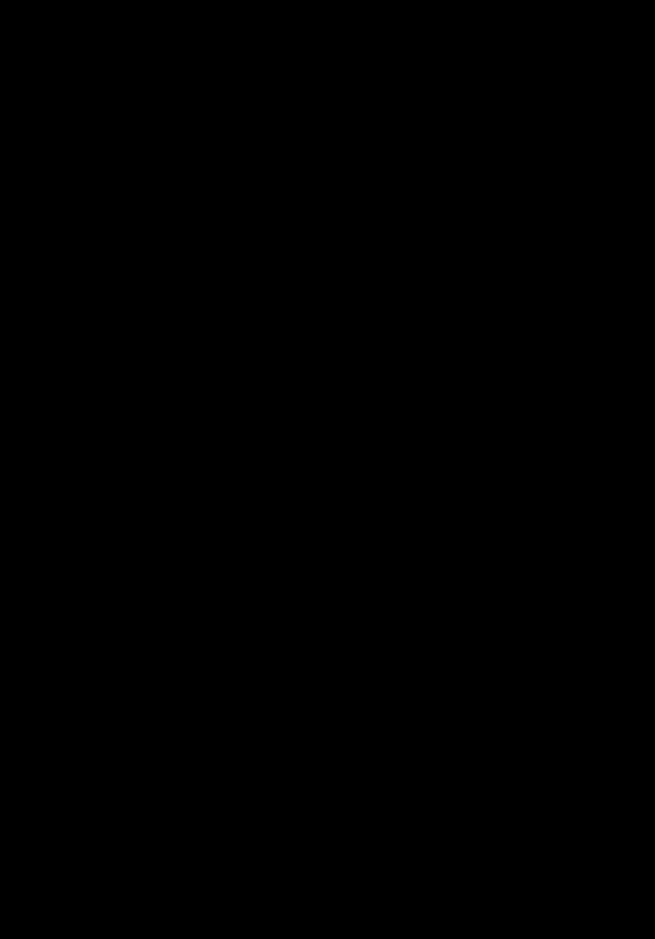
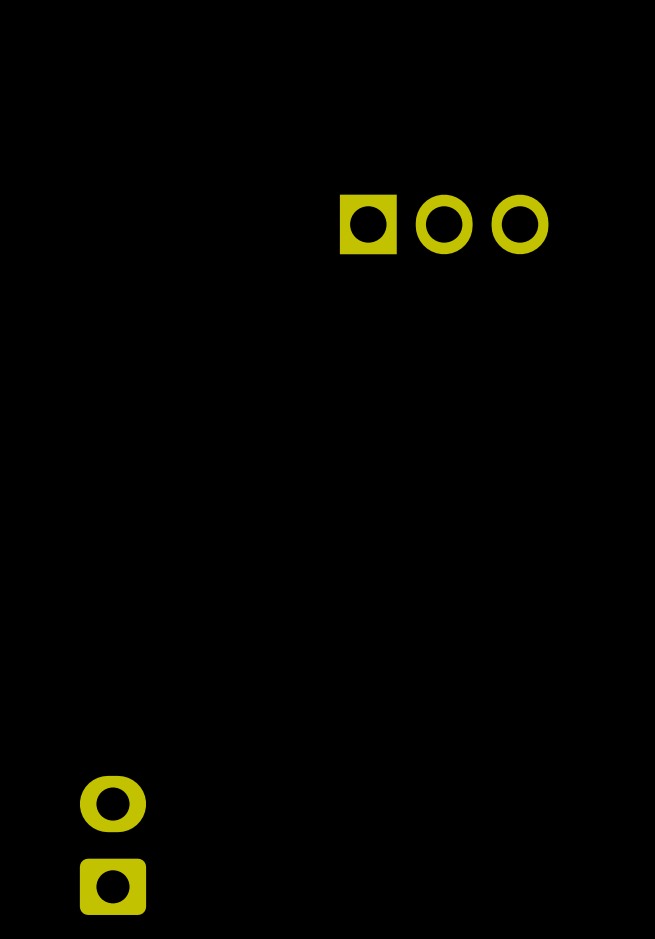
part: none -> (444, 224)
part: none -> (112, 845)

